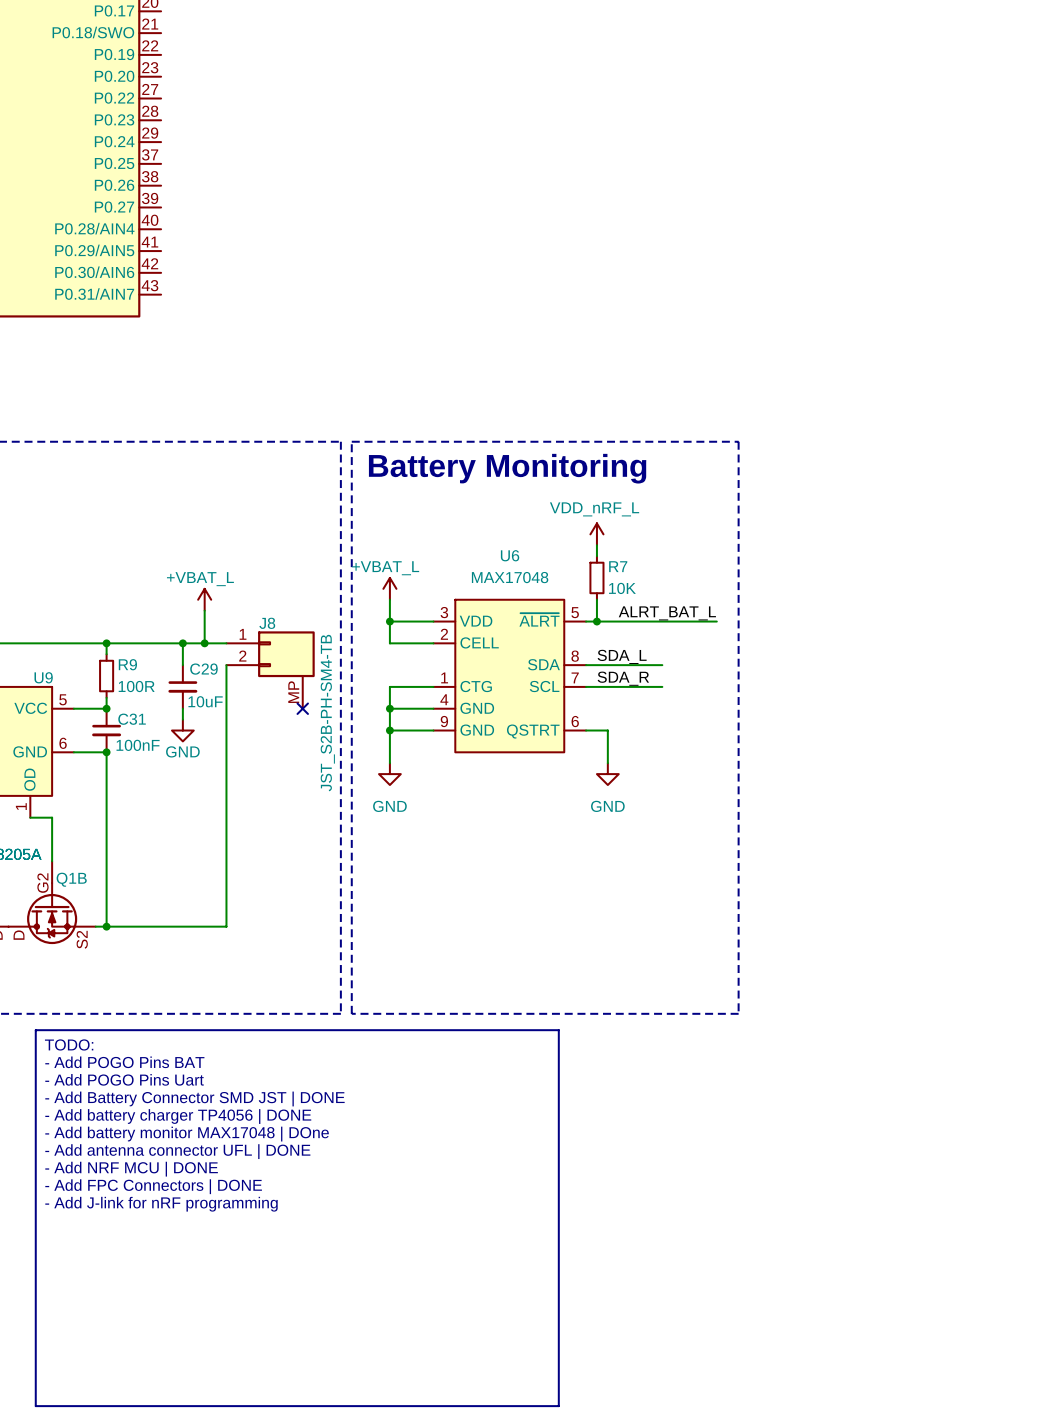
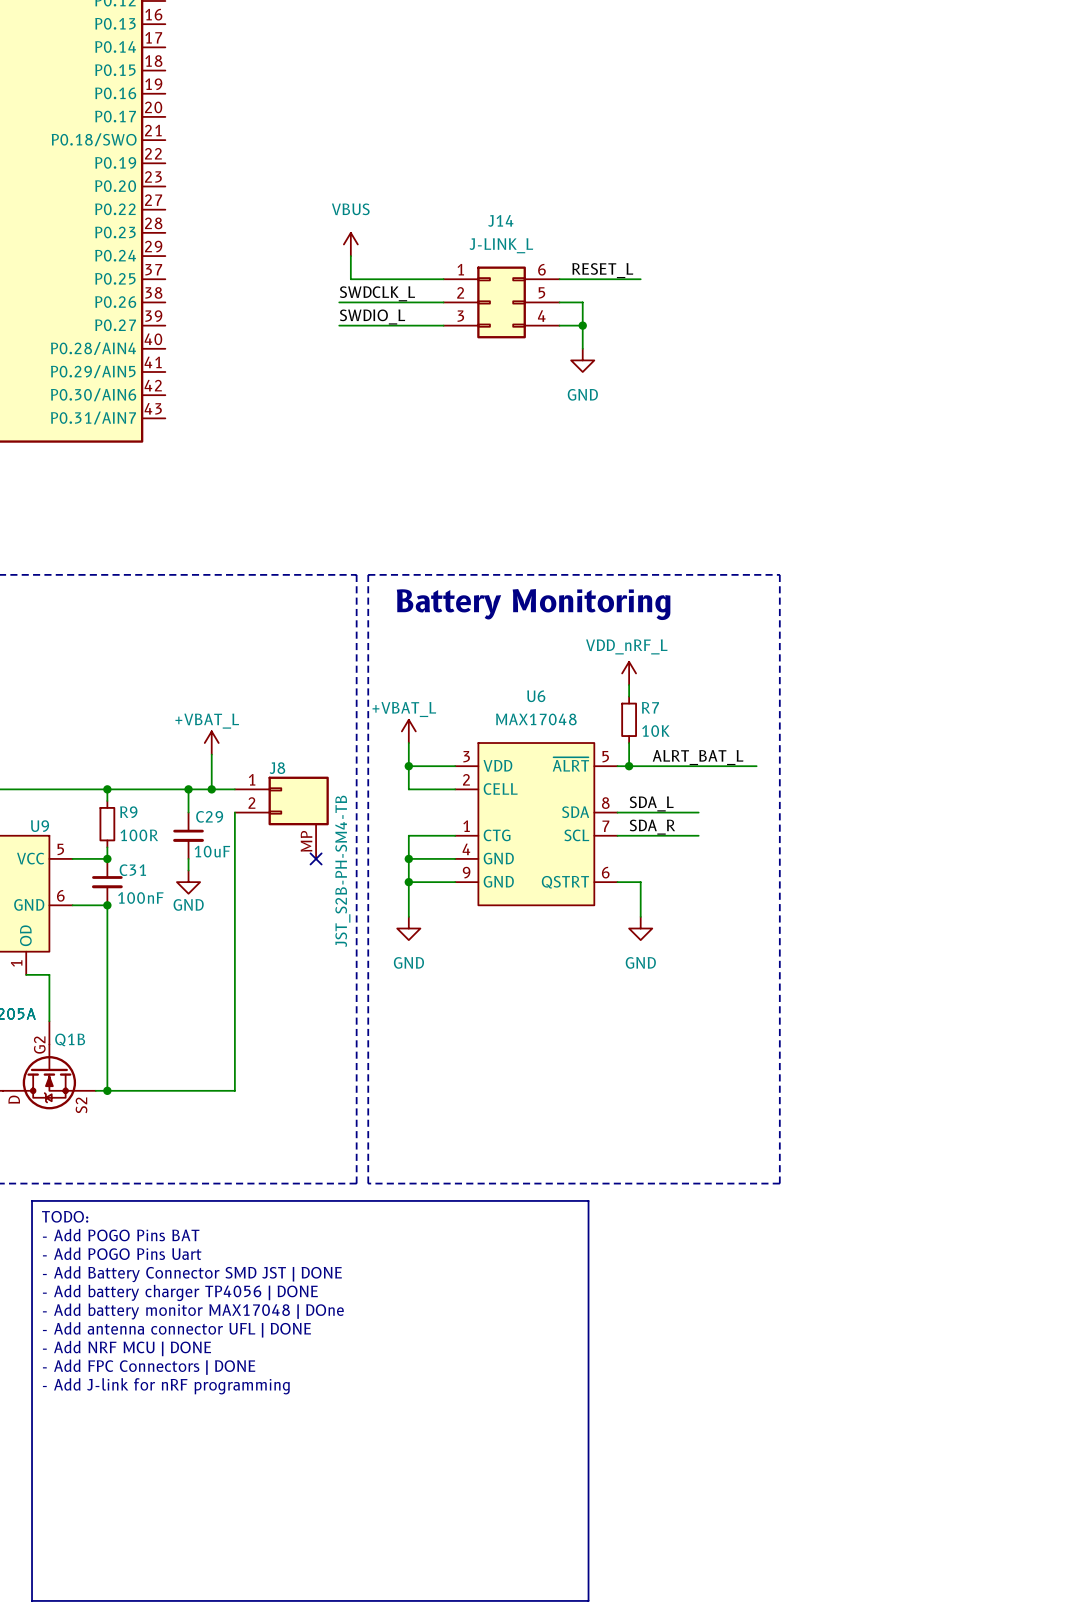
power symbol: none -> VBUS (350, 244)
wire: none -> (350, 256) (350, 279) (443, 279)
label: none -> RESET_L (602, 270)
wire: none -> (559, 279) (640, 279)
label: none -> SWDCLK_L (377, 293)
wire: none -> (339, 302) (443, 302)
J14: none -> J-LINK_L (501, 302)
wire: none -> (559, 302) (582, 302) (582, 348)
label: none -> SWDIO_L (372, 317)
wire: none -> (339, 325) (443, 325)
wire: none -> (559, 325) (582, 325)
junction: none -> (582, 325)
power symbol: none -> GND (582, 360)

